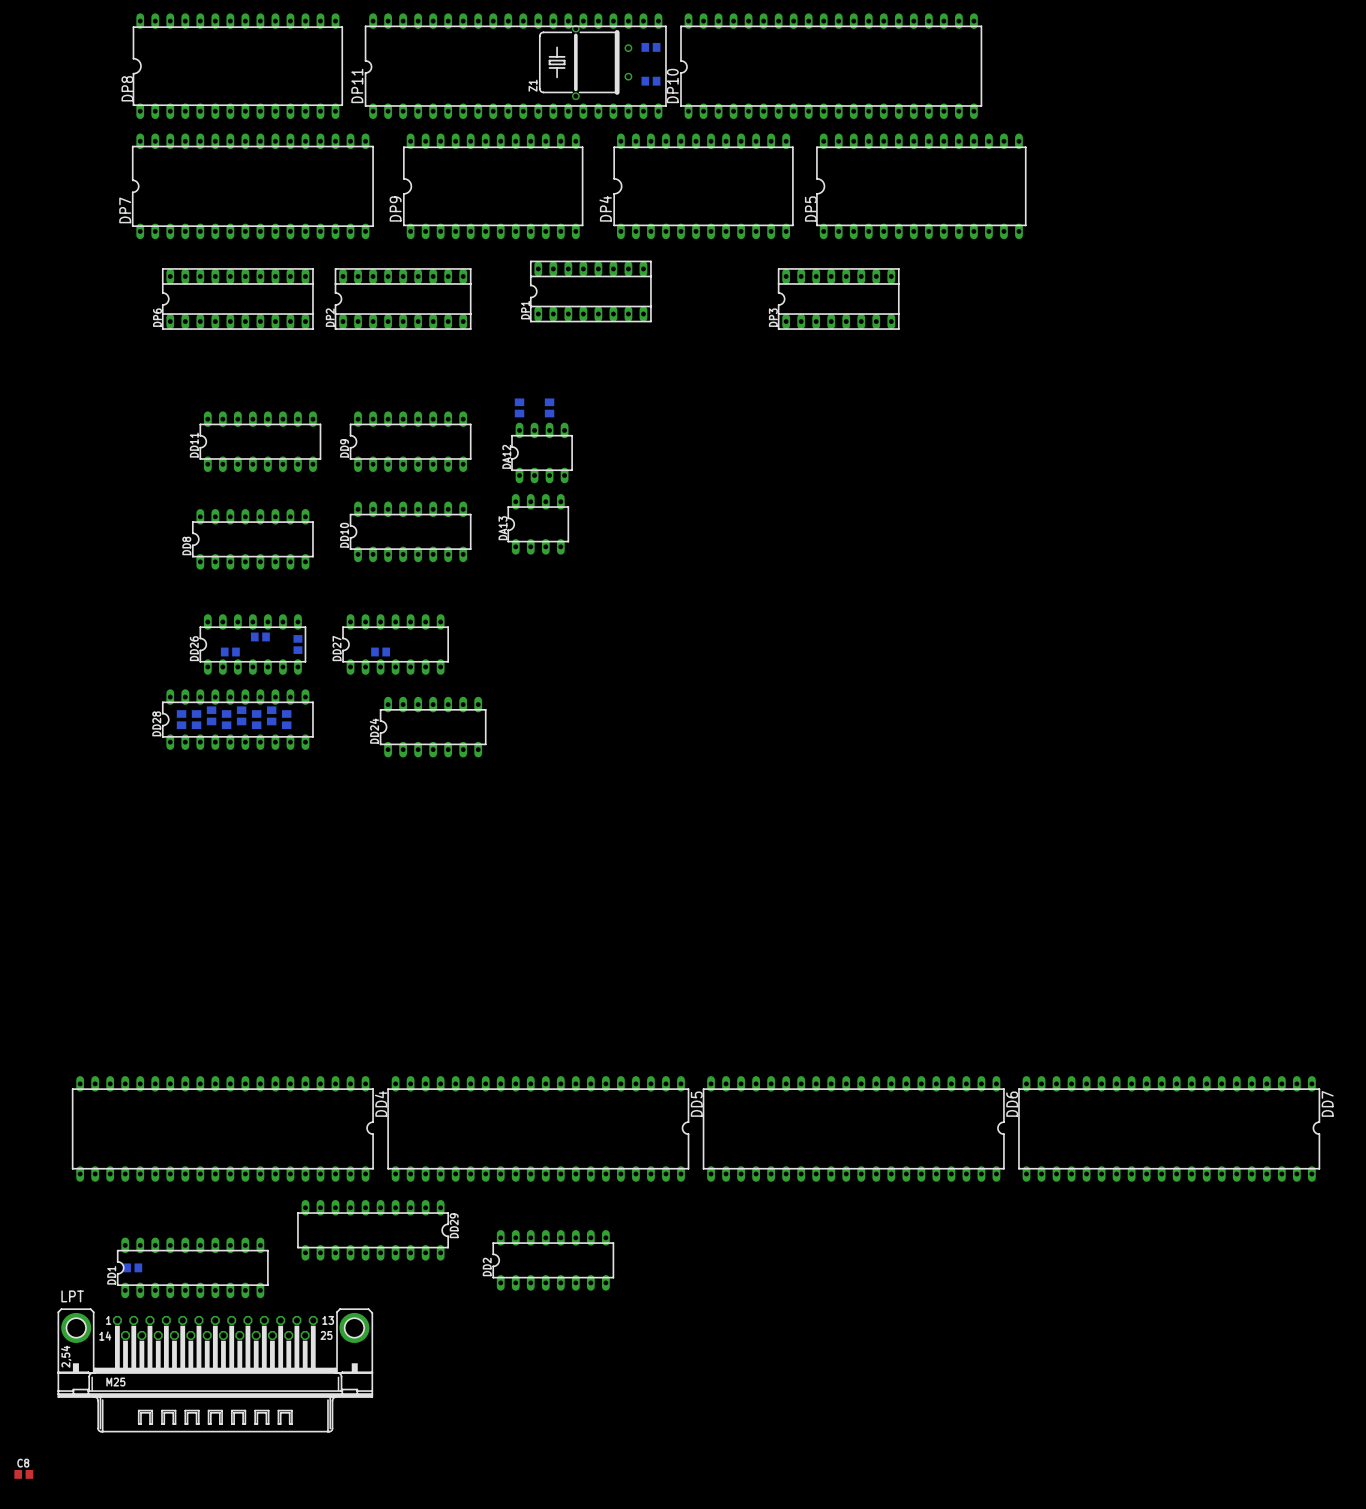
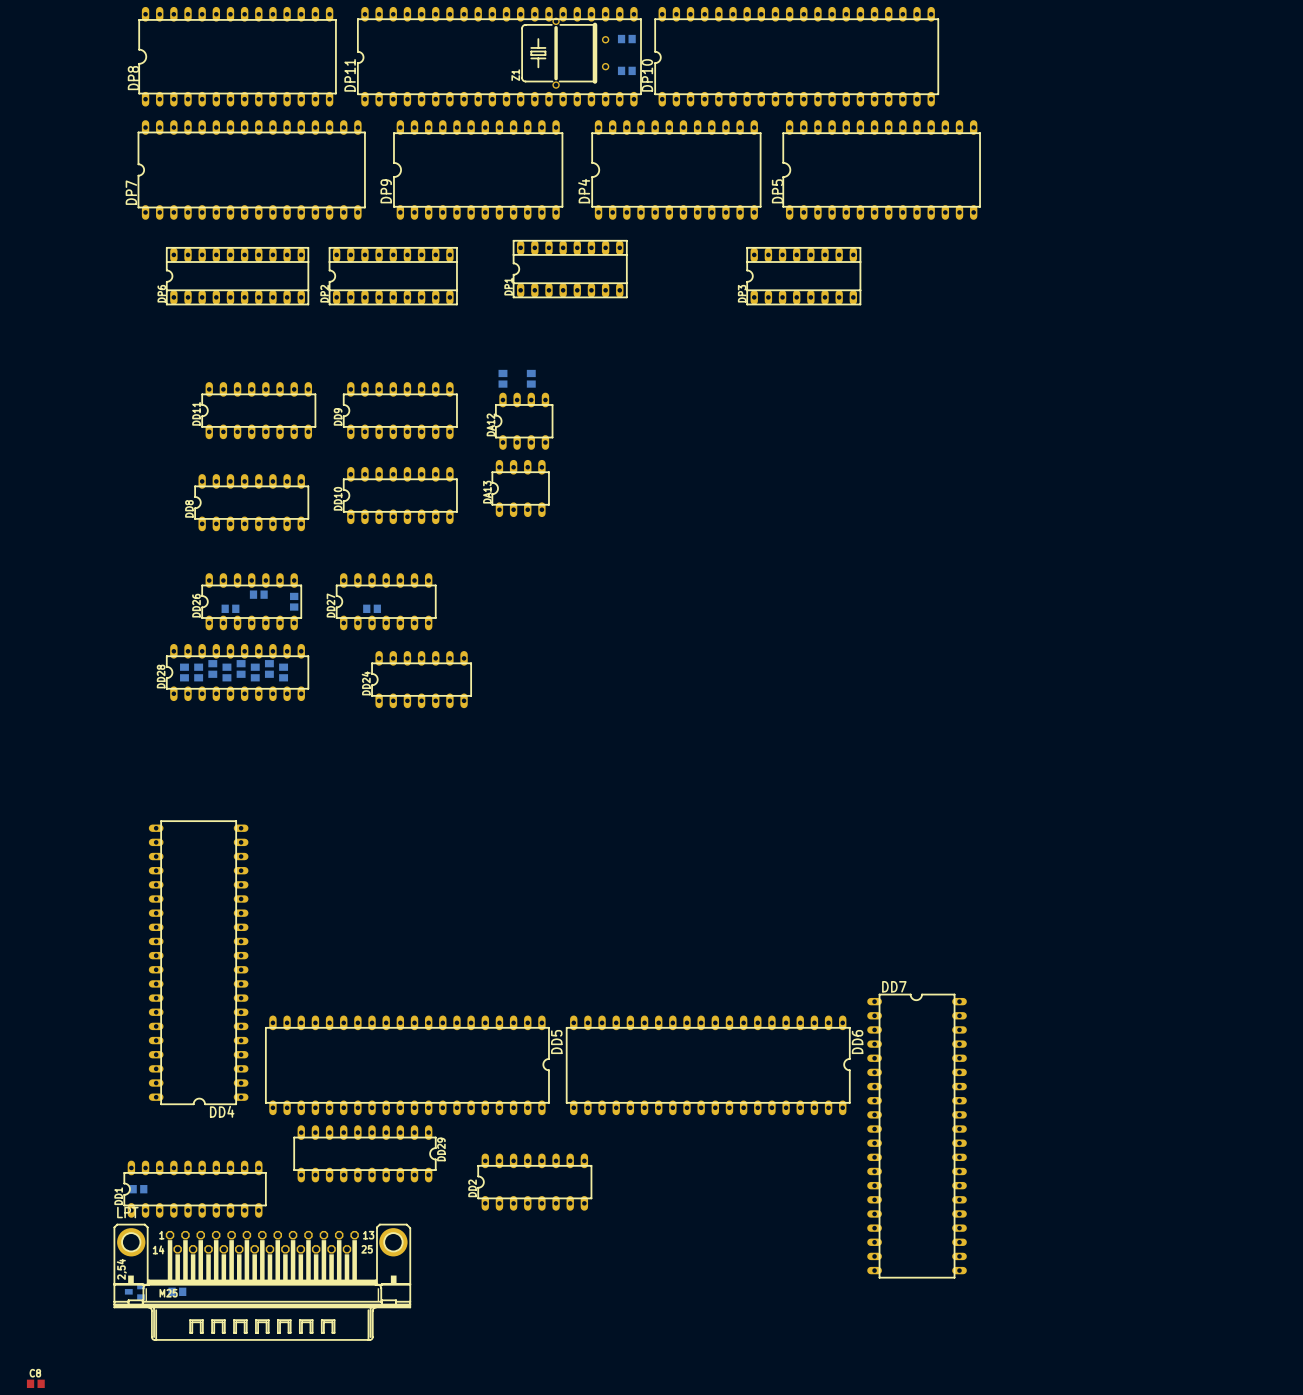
DD4 rotation: 0° (222, 1128) -> 90° clockwise (198, 962)
DD5 position: (538, 1128) -> (407, 1065)
DD6 position: (853, 1128) -> (708, 1065)
DD7 rotation: 0° (1169, 1128) -> 90° counterclockwise (917, 1136)
DD7 position: (1169, 1128) -> (917, 1136)
LPT position: (215, 1370) -> (262, 1282)
part: none -> (134, 1291)
part: none -> (177, 1291)

